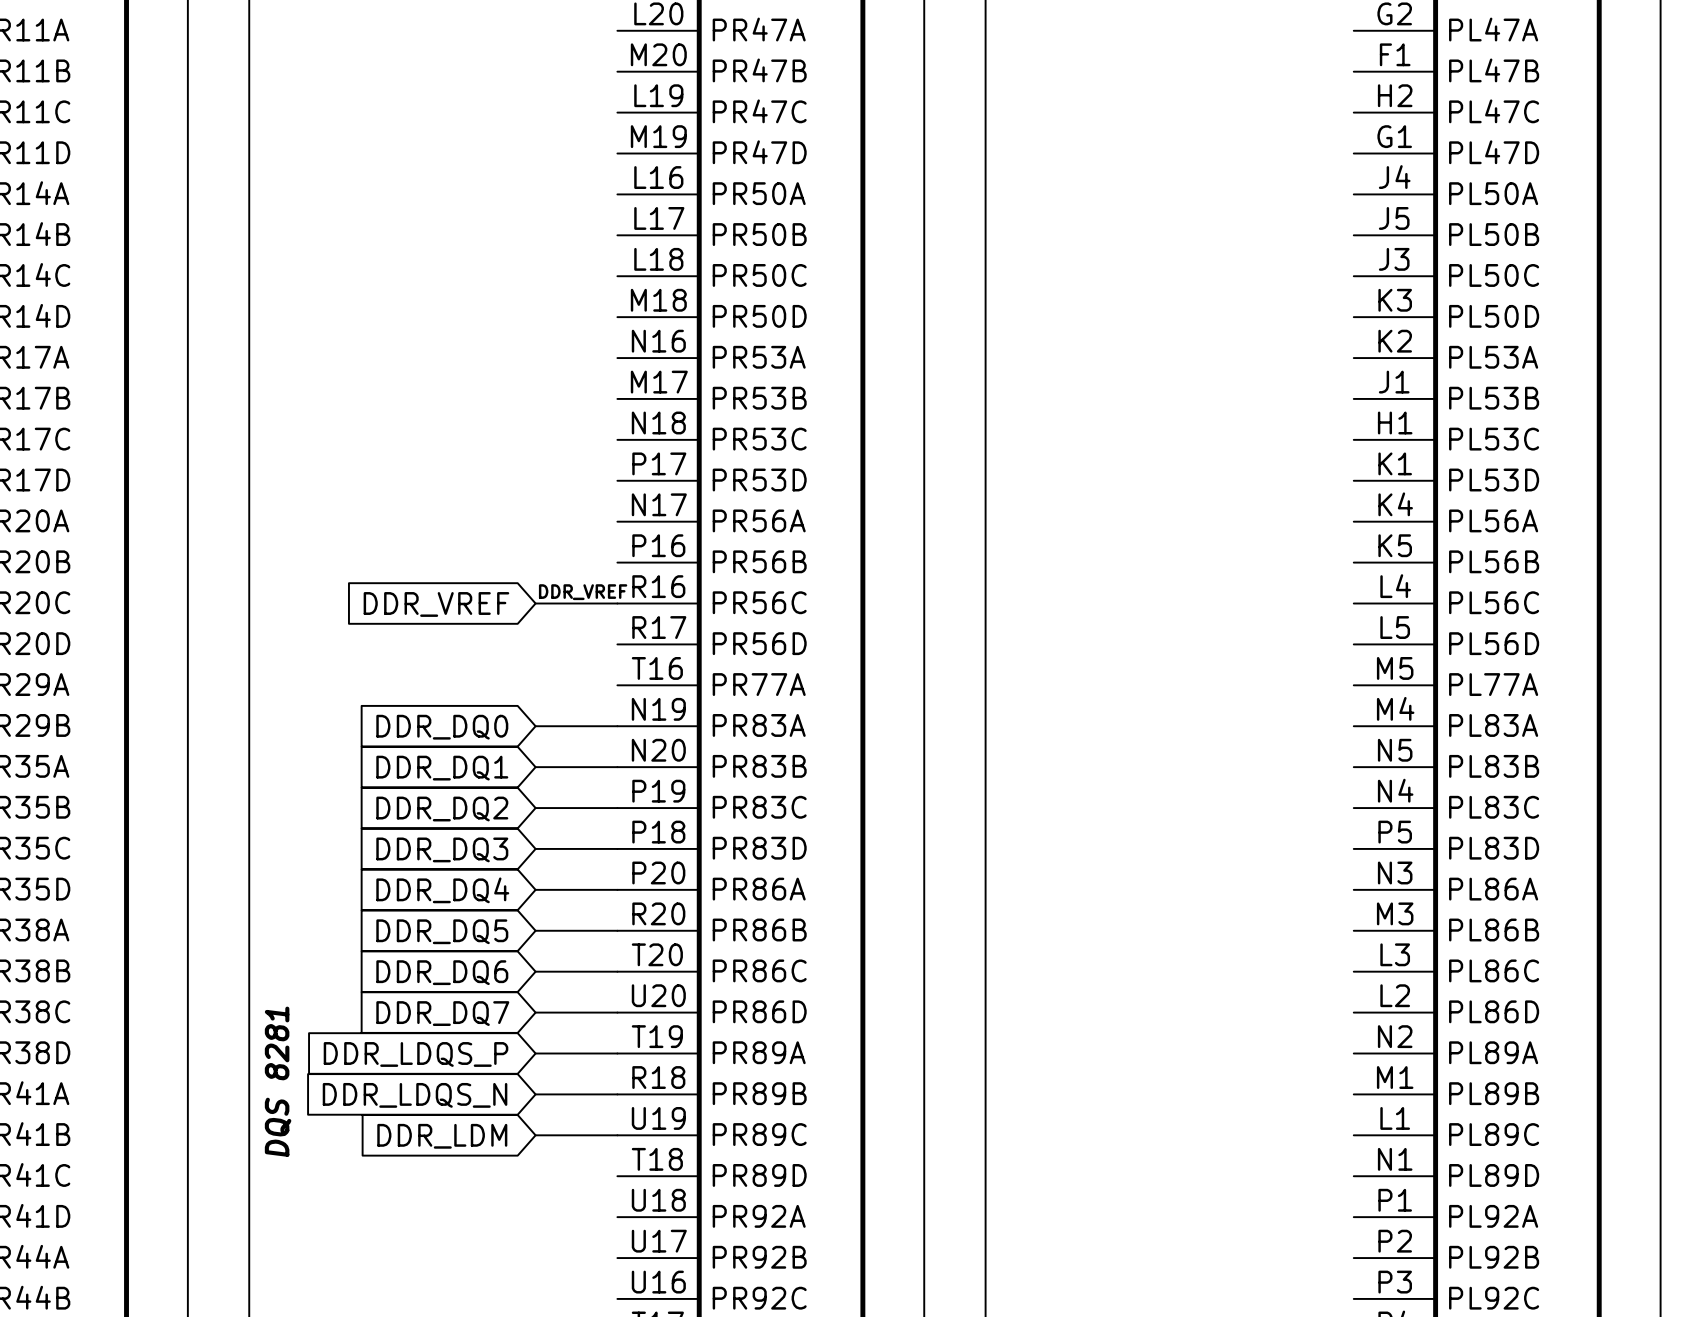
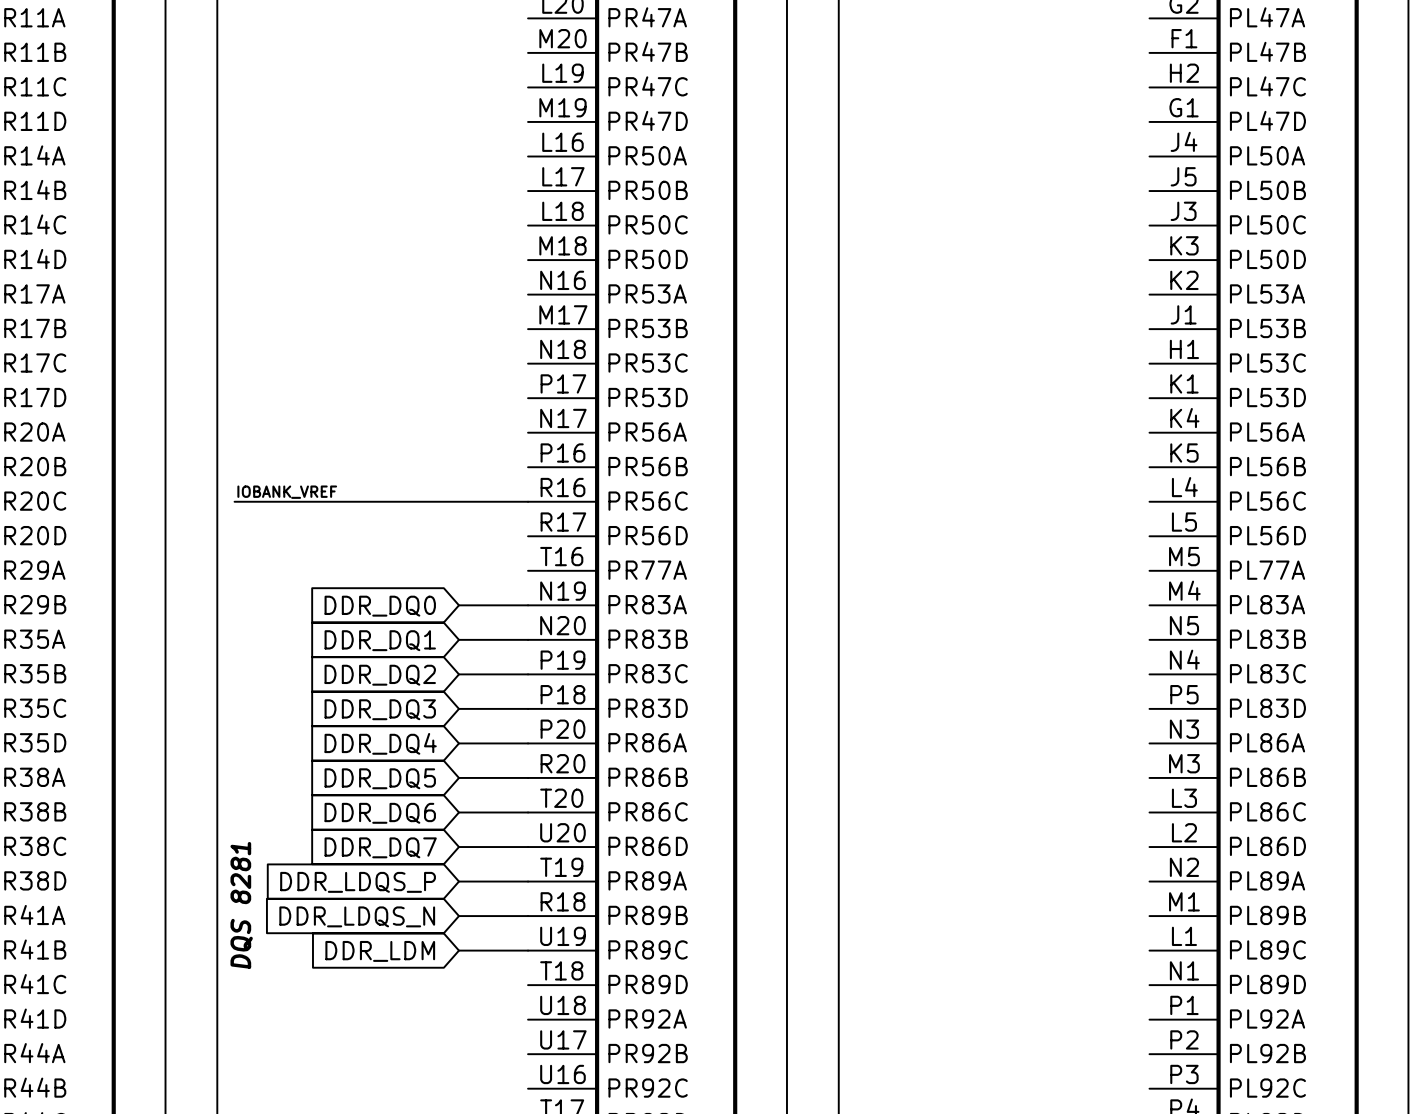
label: none -> IOBANK_VREF (287, 492)
label: DDR_VREF (583, 592) -> none
wire: none -> (234, 501) (458, 501)
global label: DDR_VREF (436, 604) -> none

